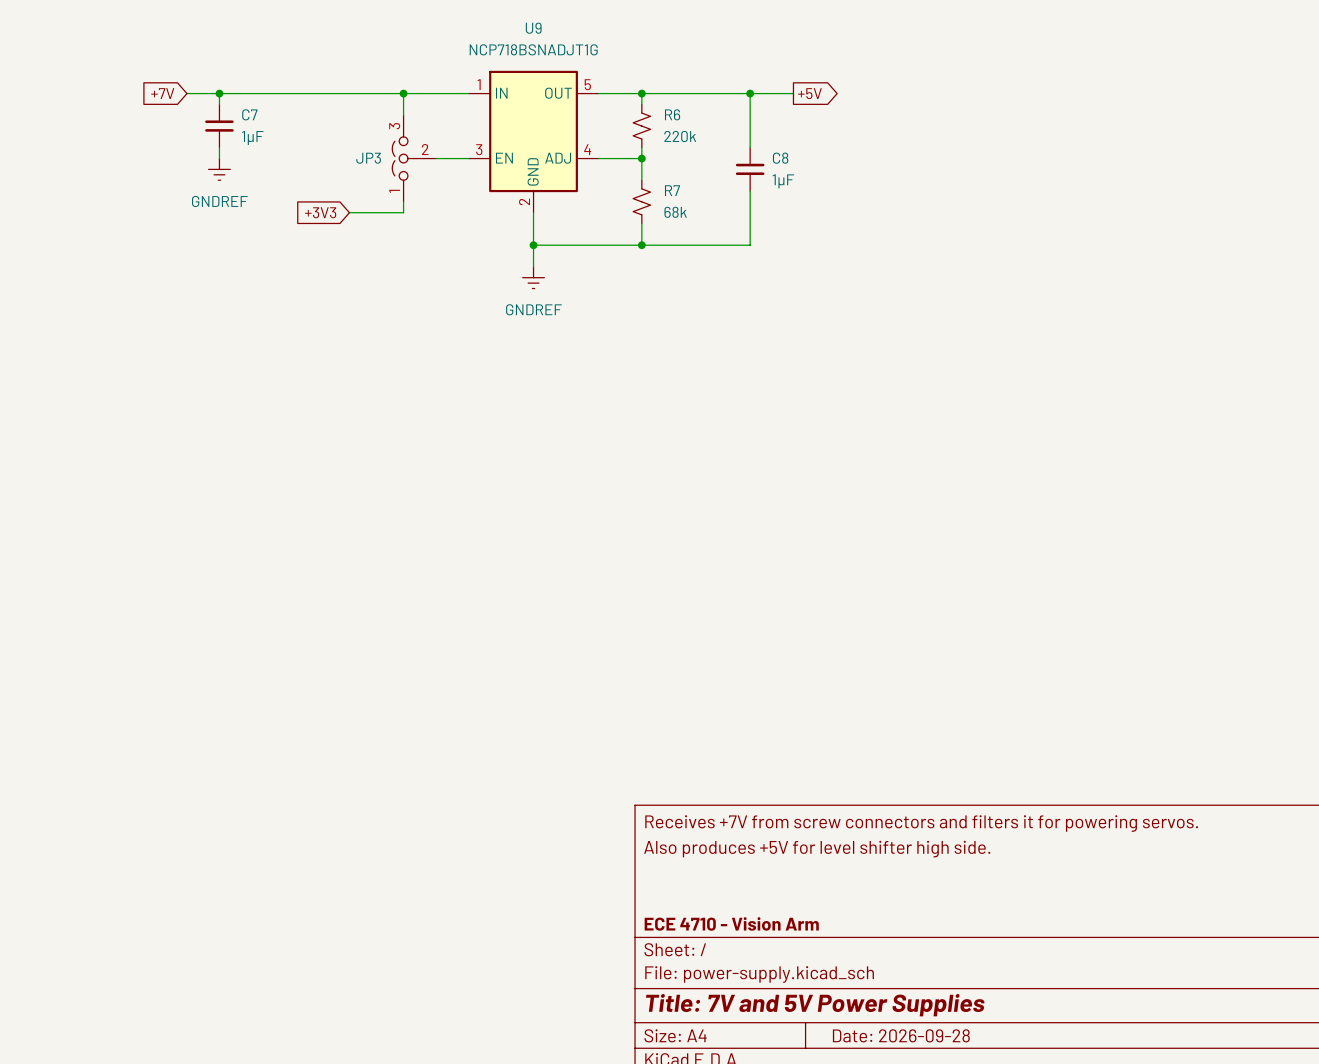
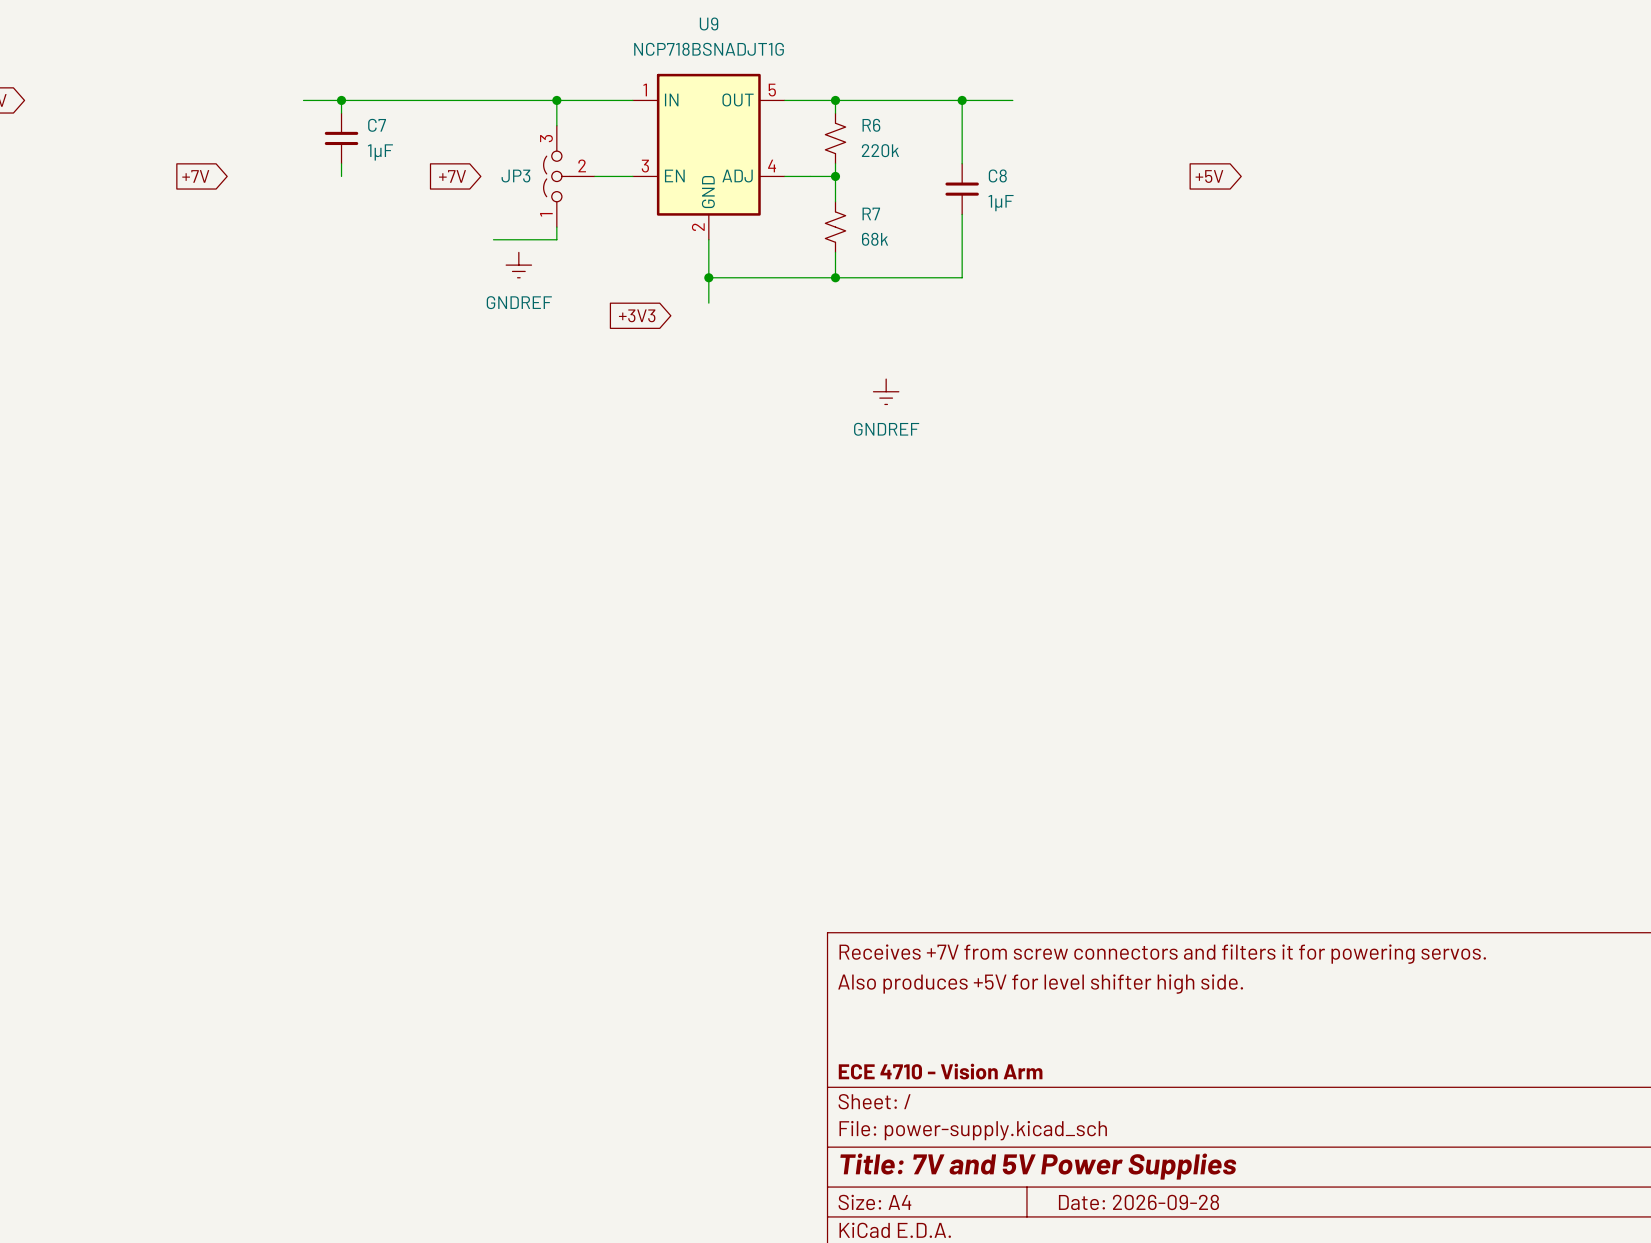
global label: +7V (162, 93) -> none
global label position: +5V (809, 93) -> +5V (1209, 176)
global label: none -> +7V (195, 176)
global label: none -> +7V (452, 176)
power symbol: GNDREF (219, 169) -> none
global label position: +3V3 (320, 212) -> +3V3 (637, 315)
power symbol: none -> GNDREF (518, 265)
power symbol: GNDREF (533, 277) -> none
power symbol: none -> GNDREF (886, 391)

